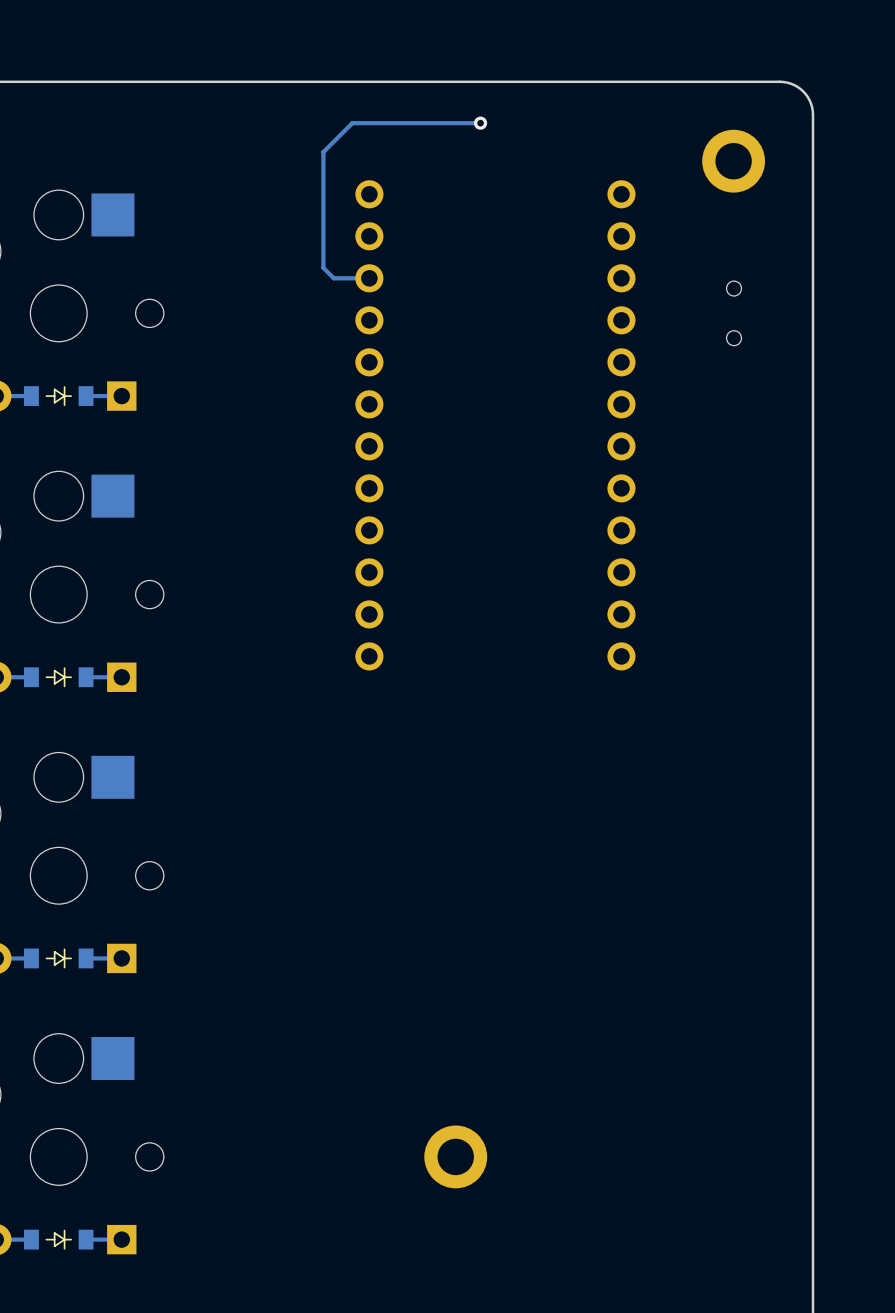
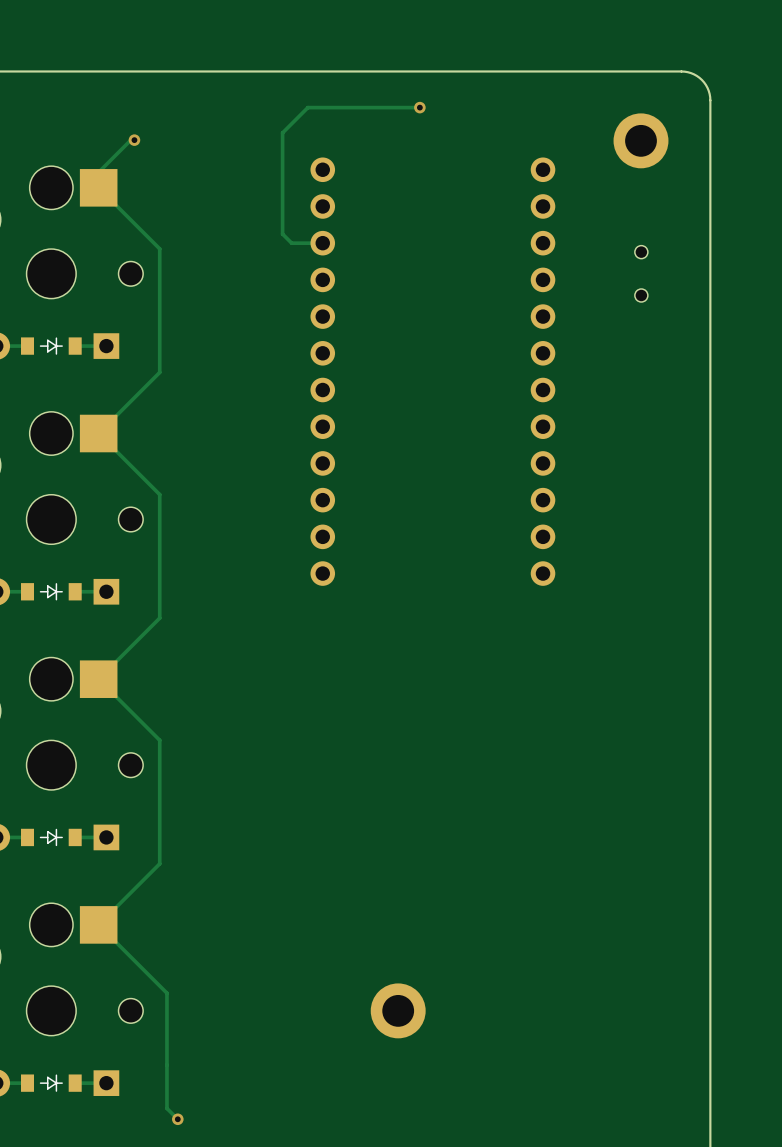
track: none -> (134, 140) (130, 140) (98, 172) (98, 187) (159, 248) (159, 372) (98, 433) (159, 494) (159, 618) (98, 679) (159, 740) (159, 863) (98, 924) (166, 993) (166, 1108) (177, 1119)
via: none -> (134, 140)
via: none -> (177, 1119)

